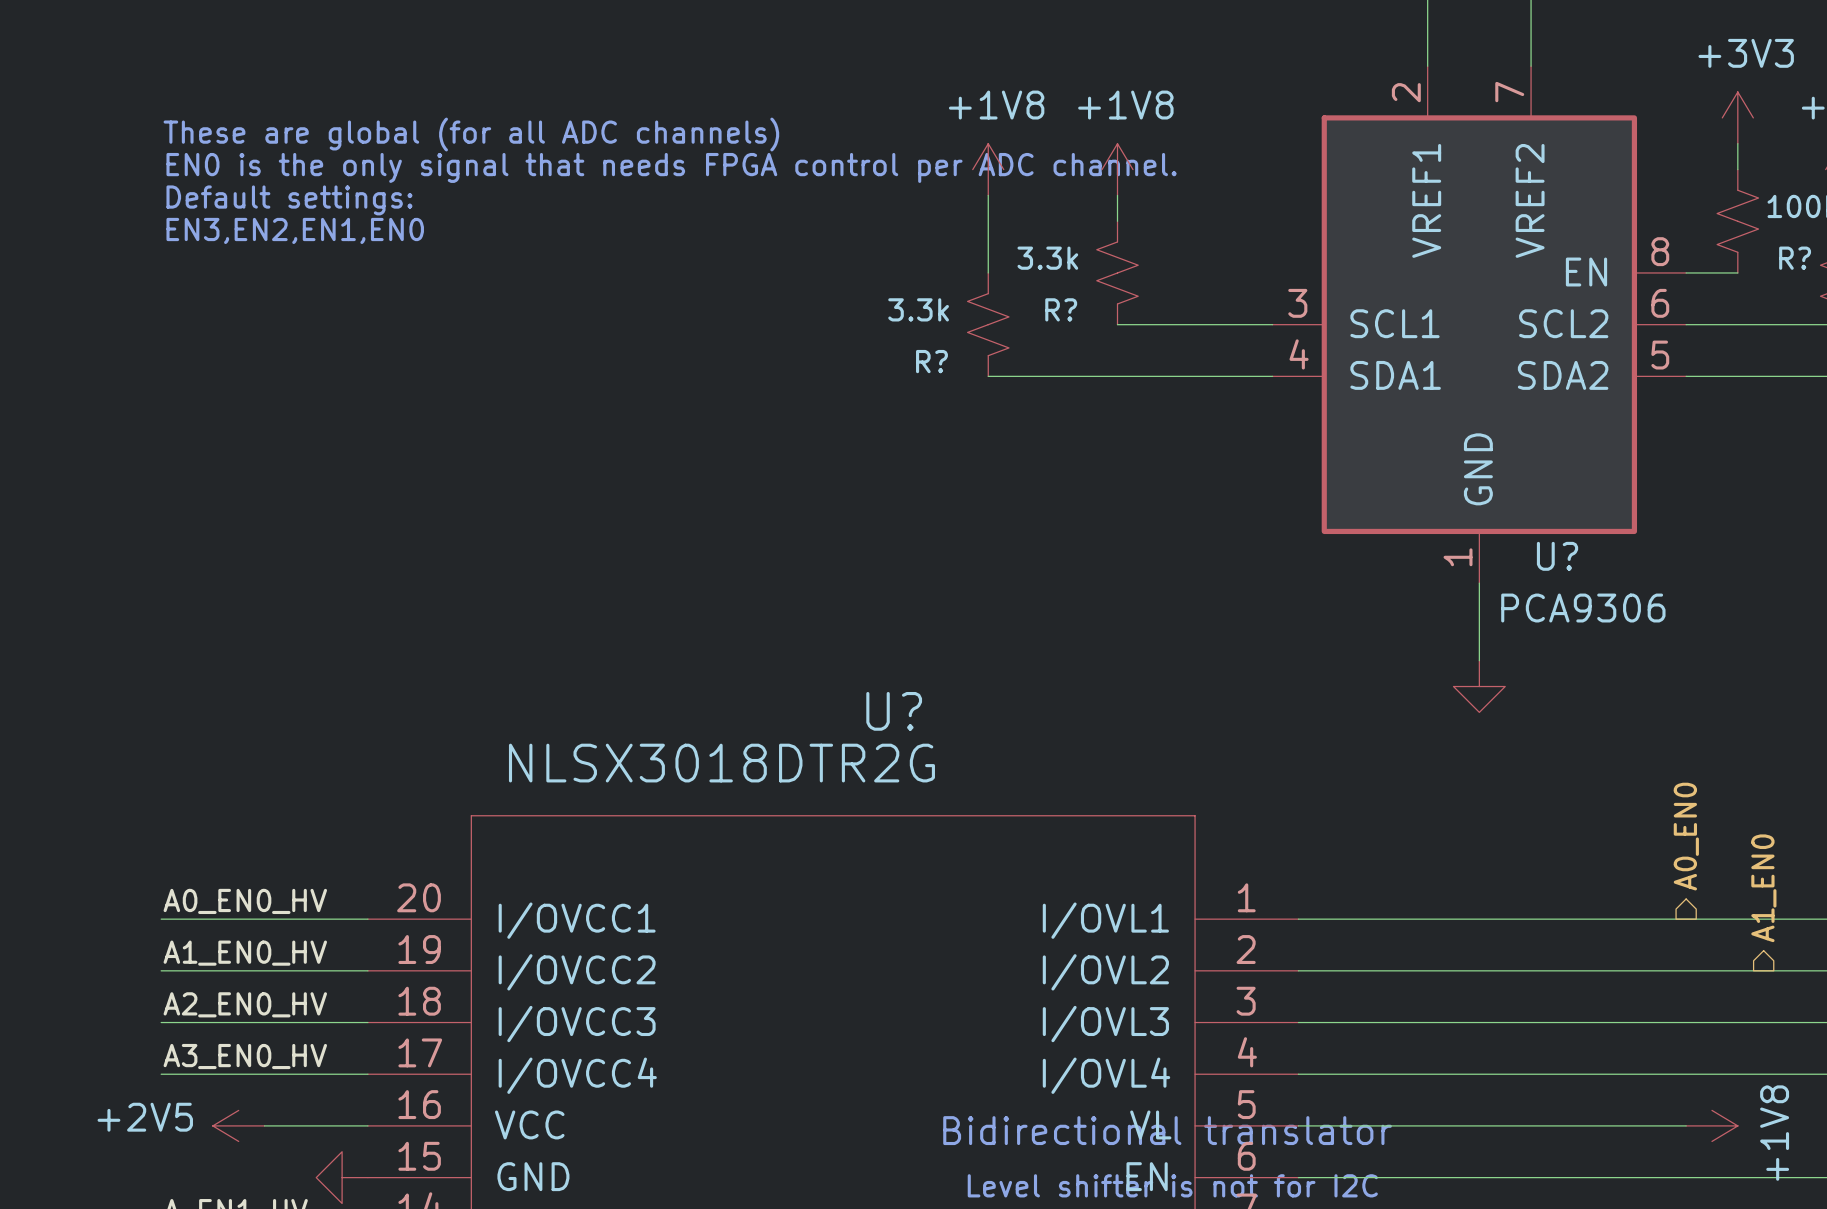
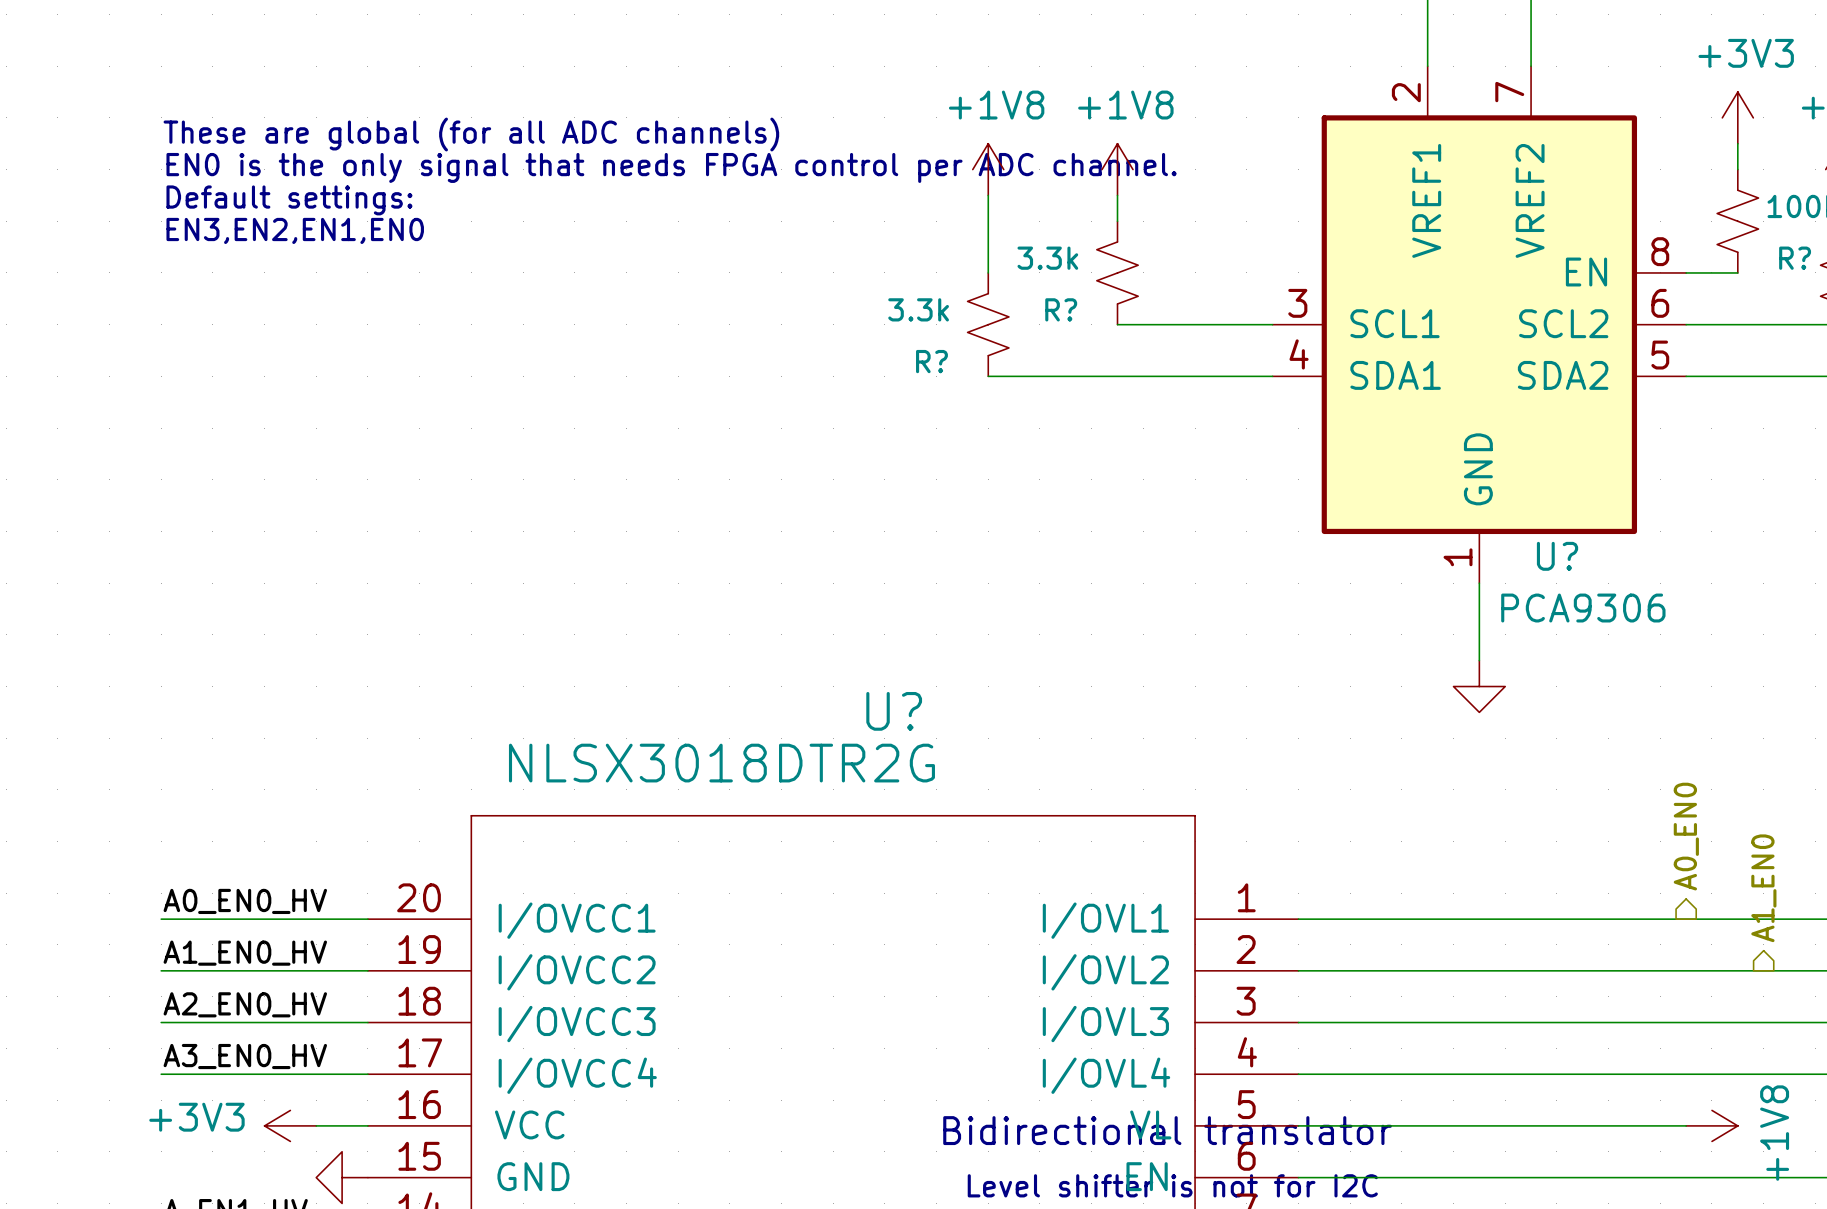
power symbol: +2V5 (238, 1125) -> none
power symbol: none -> +3V3 (290, 1125)

